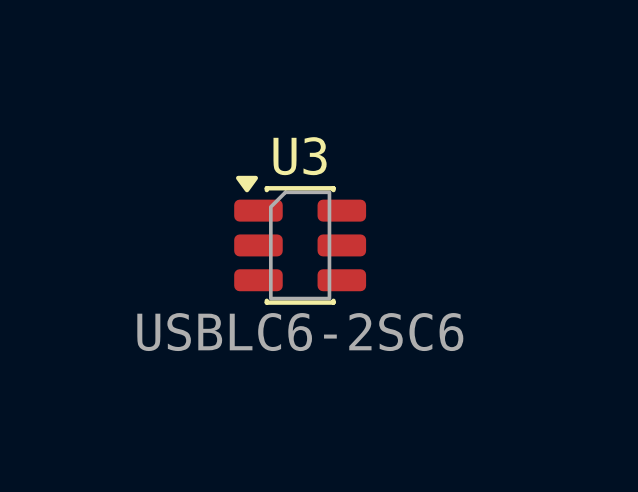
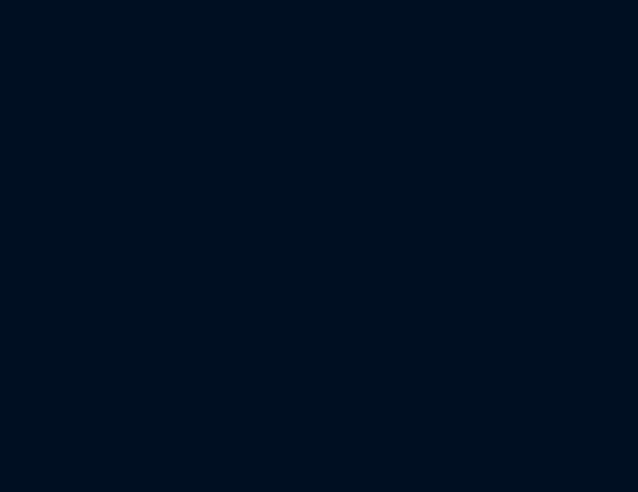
U3: USBLC6-2SC6 (300, 240) -> none

